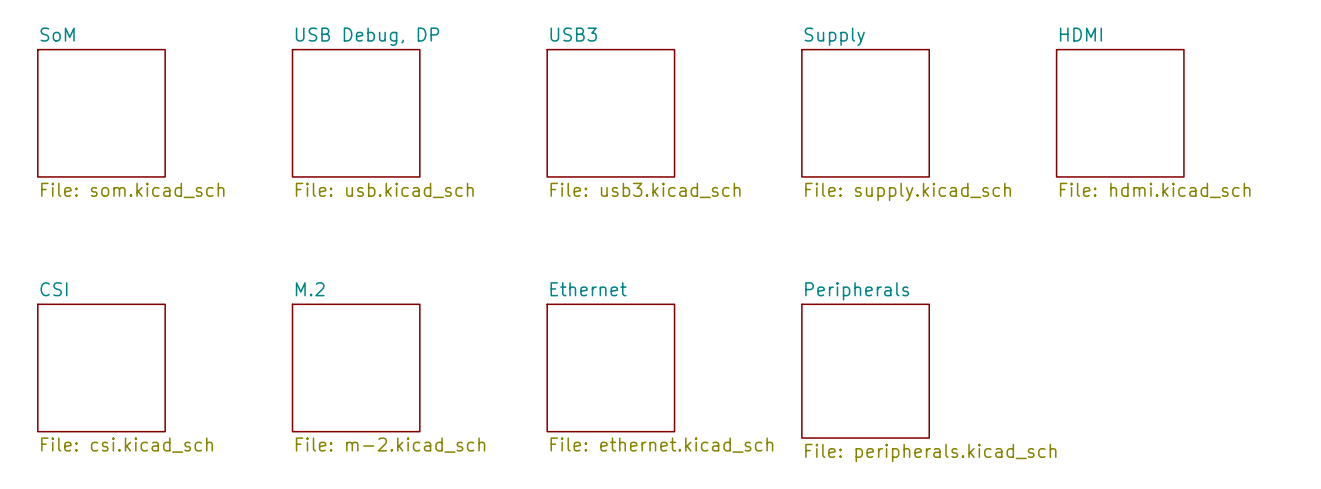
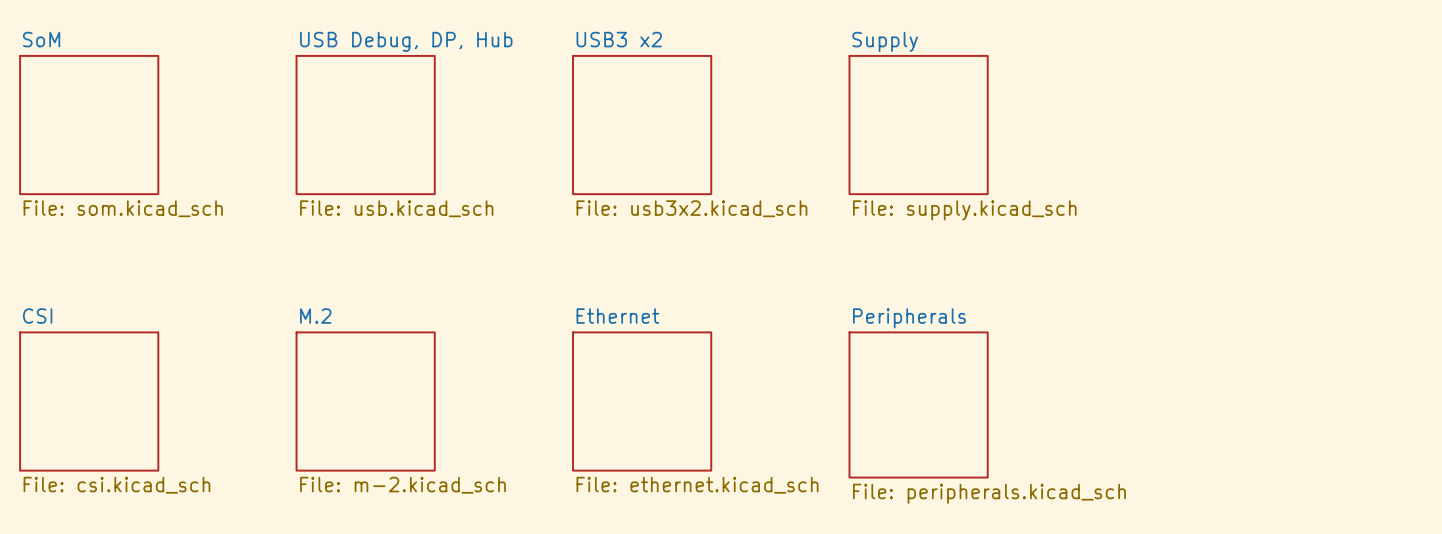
sheet USB3 name: USB3 (573, 34) -> USB3 x2 (619, 39)
sheet USB Debug, DP name: USB Debug, DP (367, 36) -> USB Debug, DP, Hub (406, 41)
sheet HDMI: File: hdmi.kicad_sch (1120, 113) -> none
sheet USB3 value: File: usb3.kicad_sch (645, 190) -> File: usb3x2.kicad_sch (691, 208)

